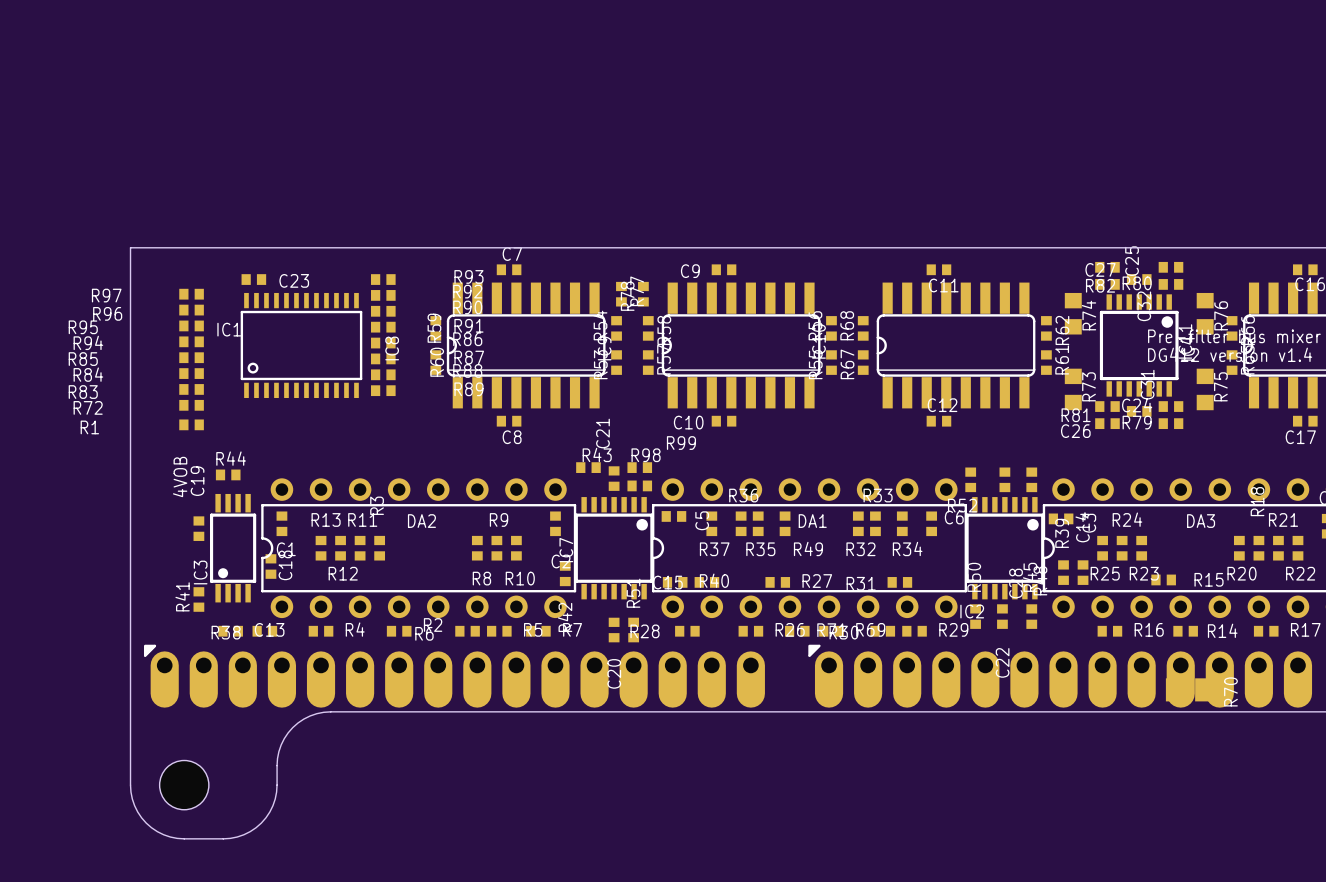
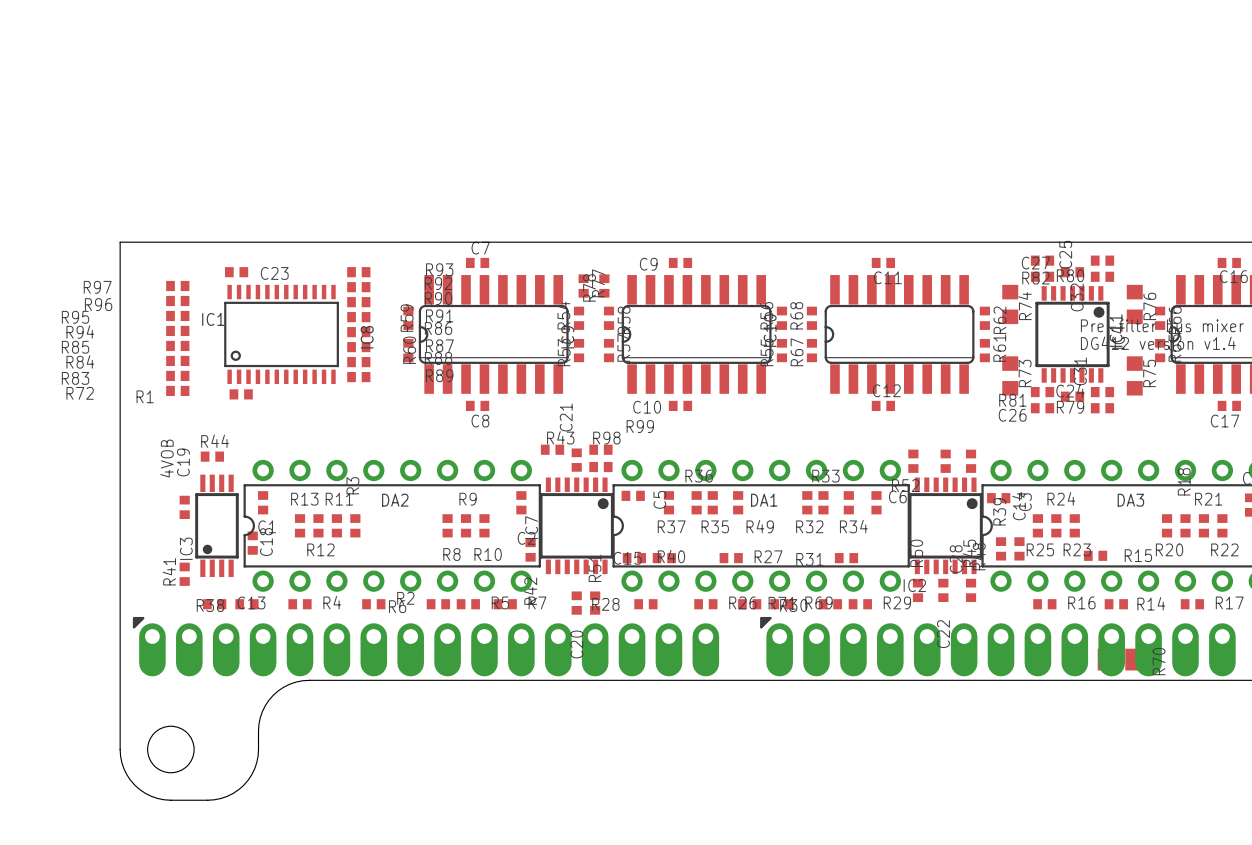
R1 position: (191, 424) -> (241, 394)

